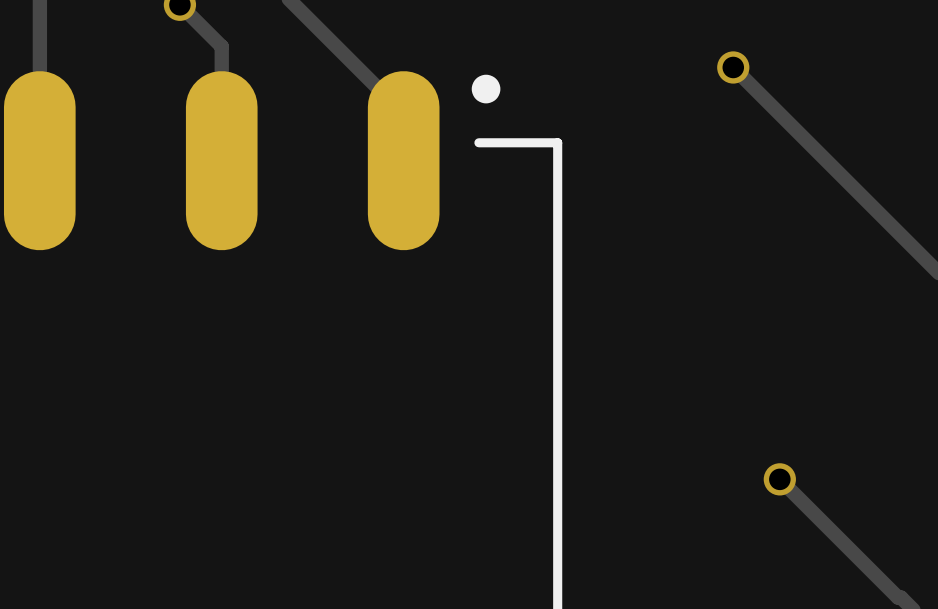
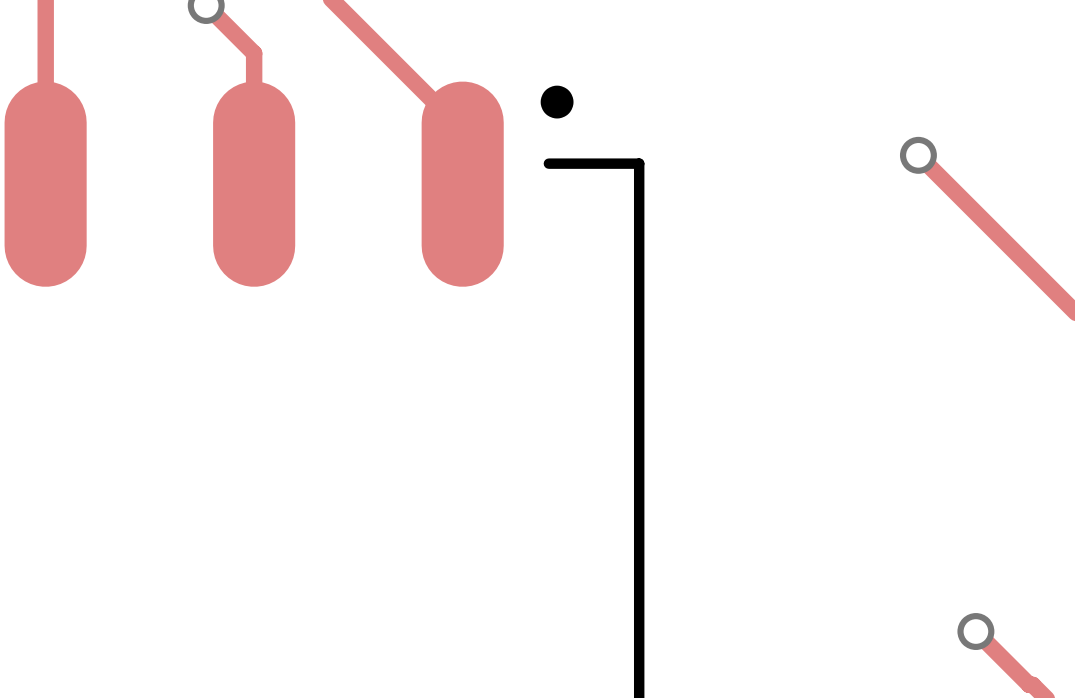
track: (733, 67) (801, 135) -> none
via position: (733, 67) -> (918, 155)
track: (779, 479) (851, 550) -> none
via position: (779, 479) -> (975, 631)

